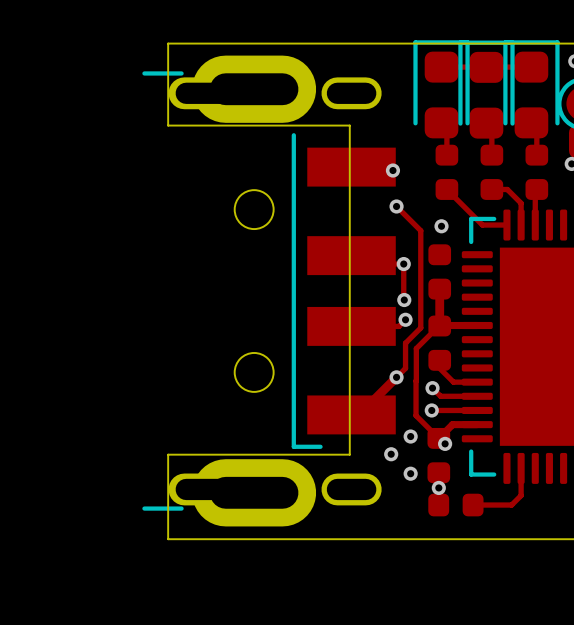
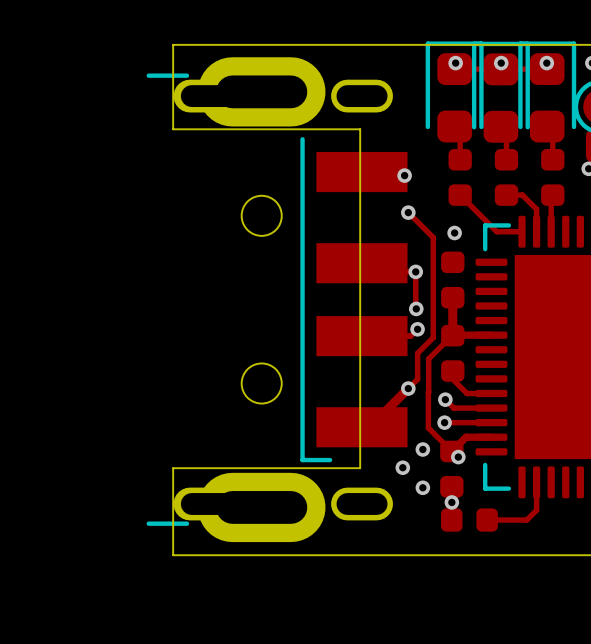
via: none -> (455, 63)
via: none -> (501, 63)
via: none -> (546, 63)

